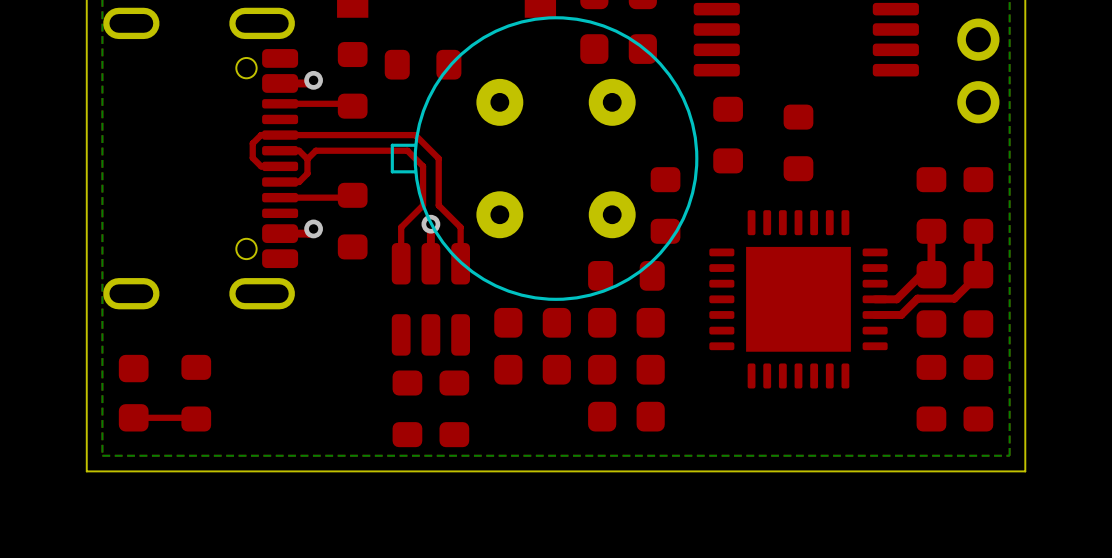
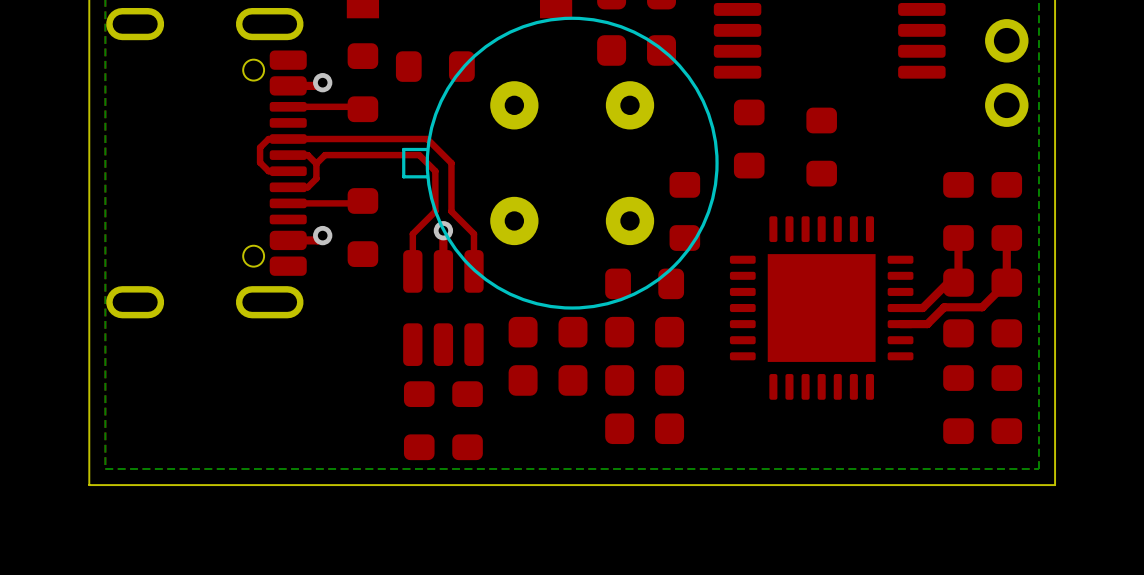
part: (133, 393) -> none
part: (196, 393) -> none
top track: (133, 417) (196, 418) -> none

